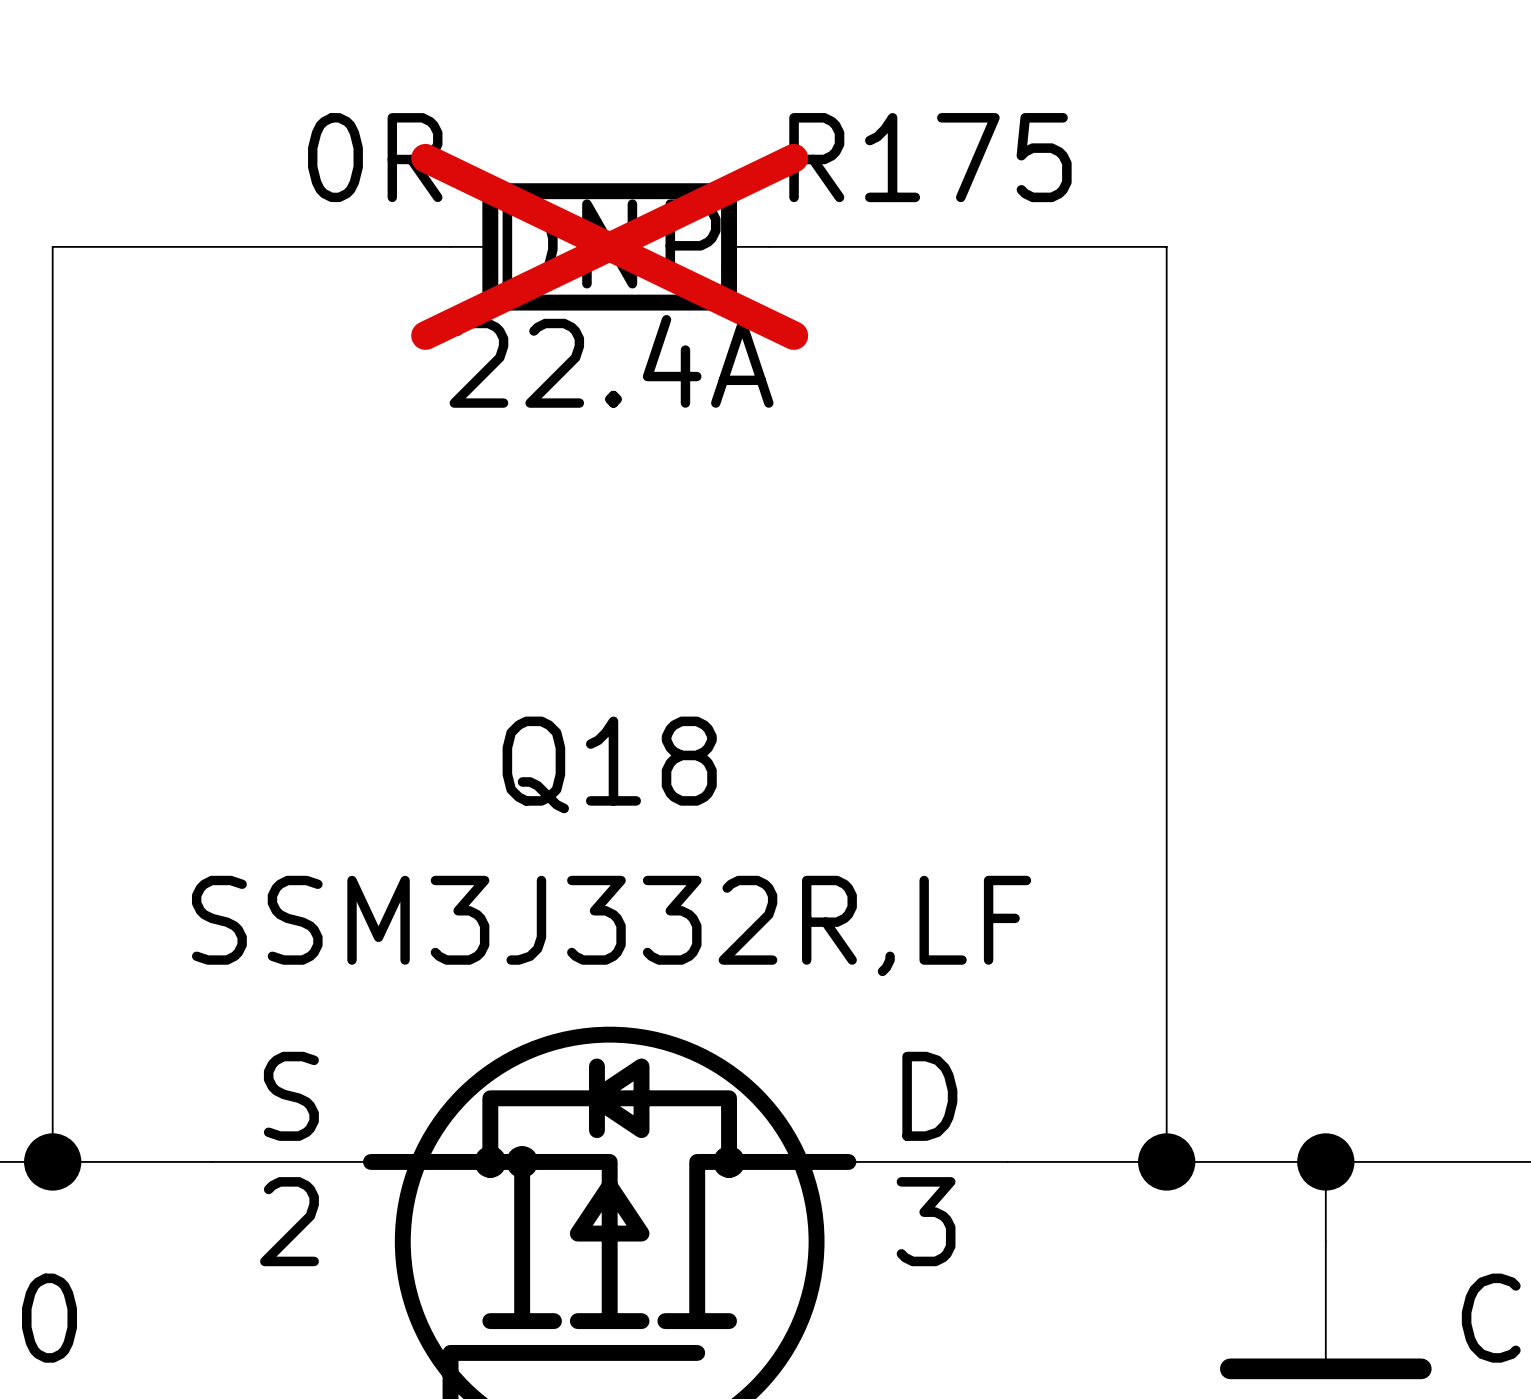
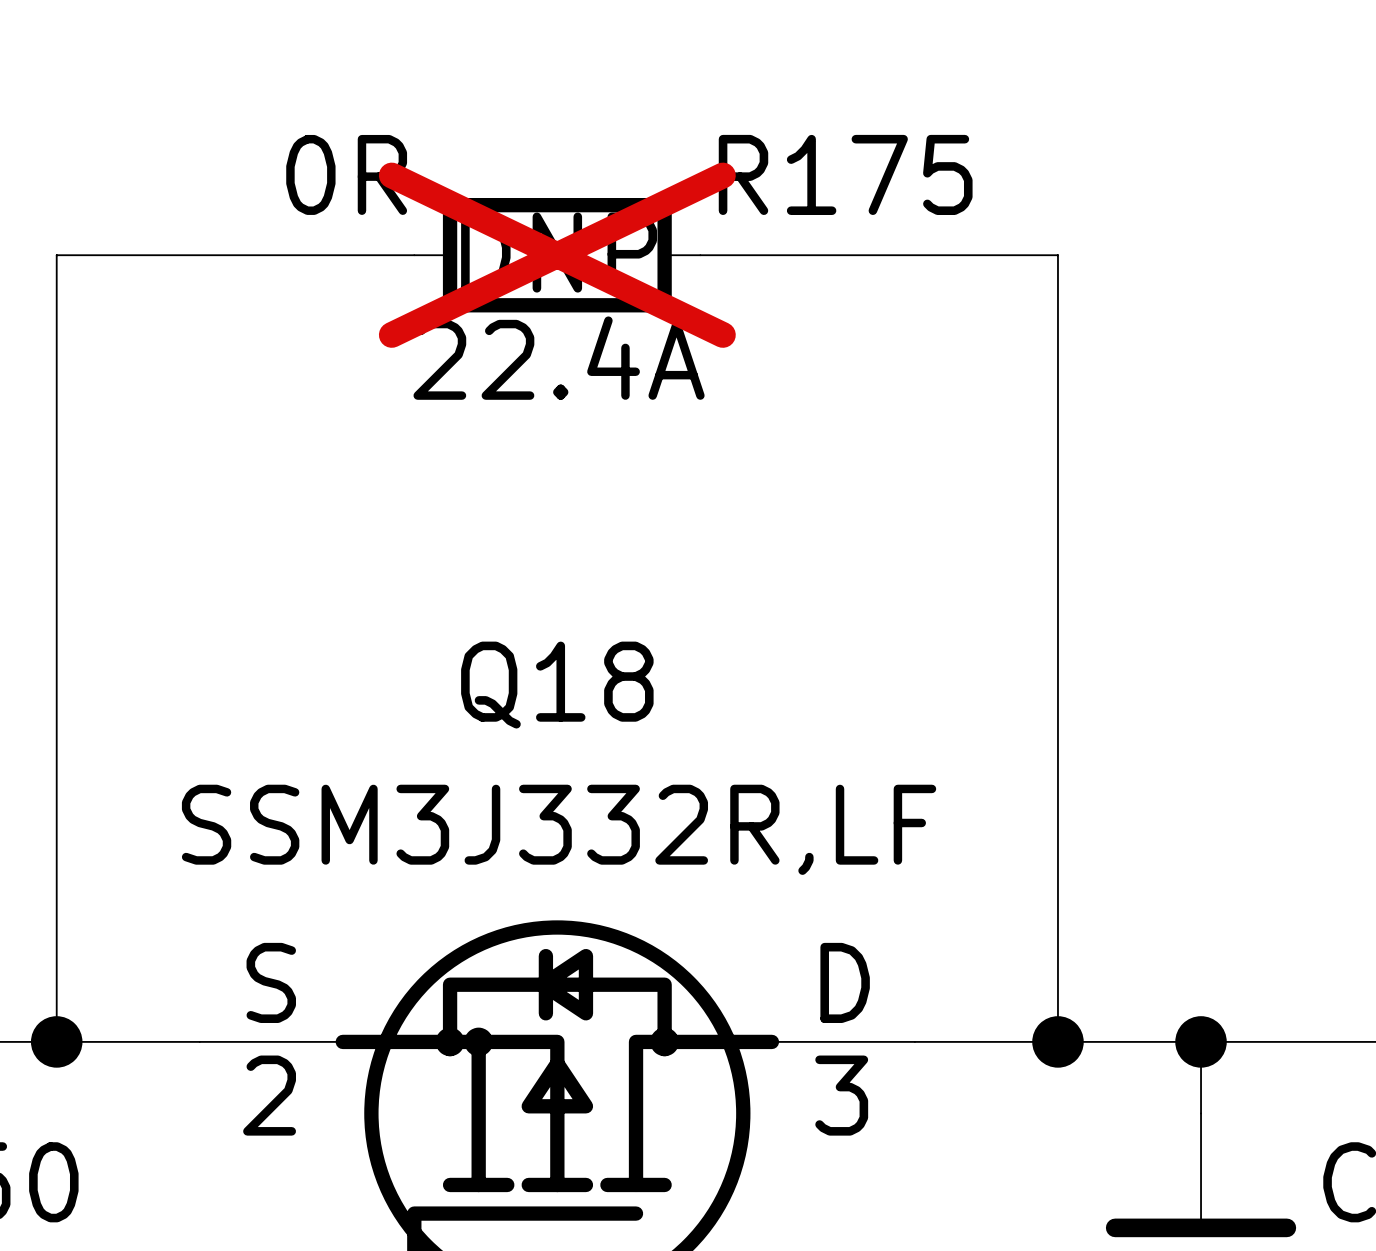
wire: (450, 246) (52, 246) (52, 286) -> (414, 255) (56, 255)
R175 position: (609, 246) -> (557, 255)
wire: (768, 246) (1166, 246) (1166, 286) -> (700, 255) (1057, 255)

